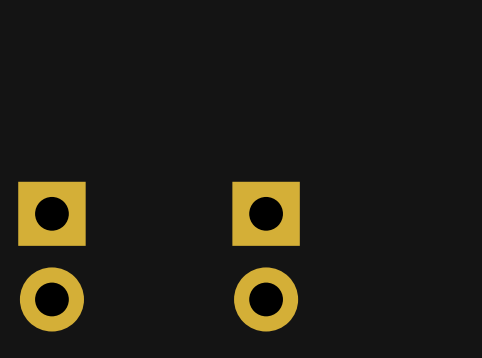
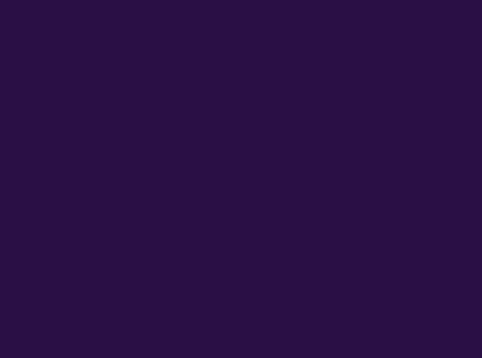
part: (51, 256) -> none
part: (266, 256) -> none

